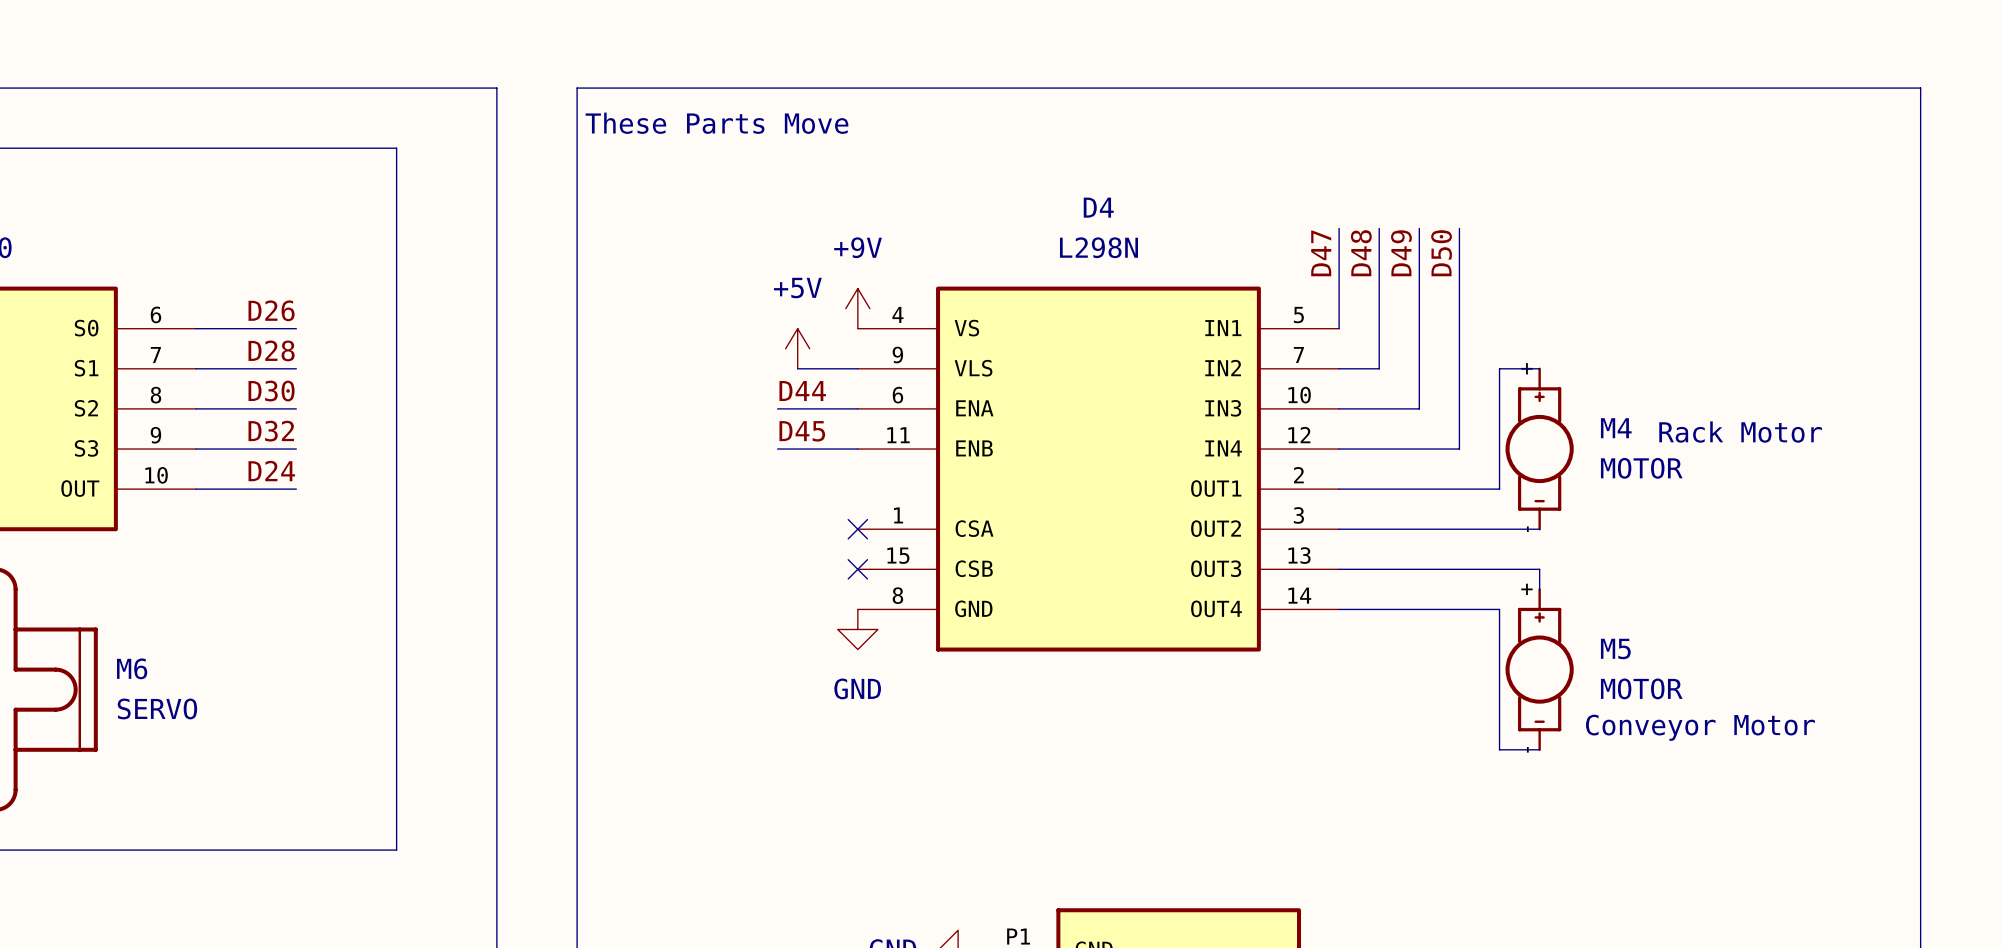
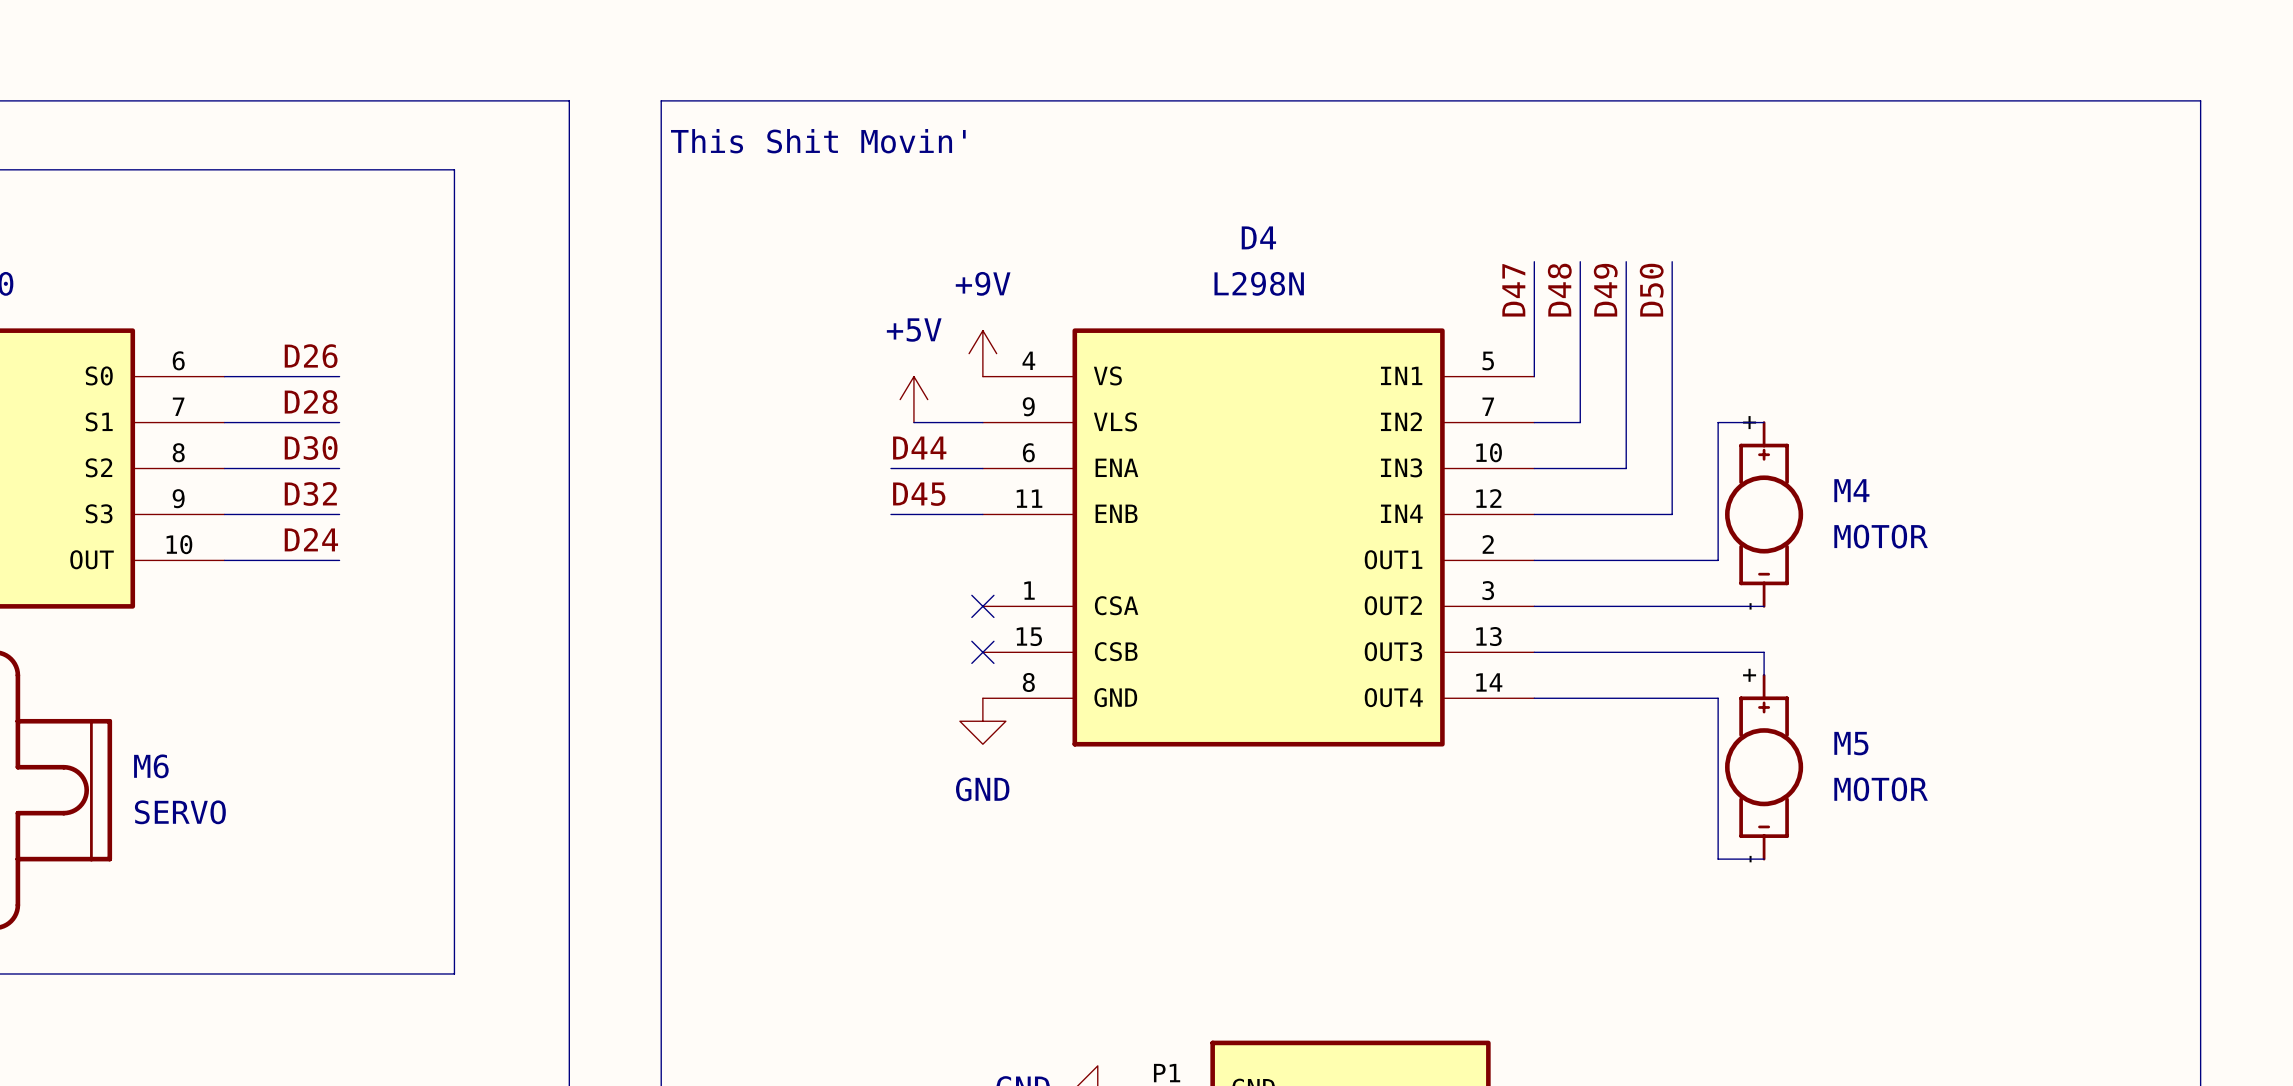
text: These Parts Move (716, 123) -> This Shit Movin' (818, 141)
text: Rack Motor (1740, 432) -> none
text: Conveyor Motor (1700, 727) -> none

